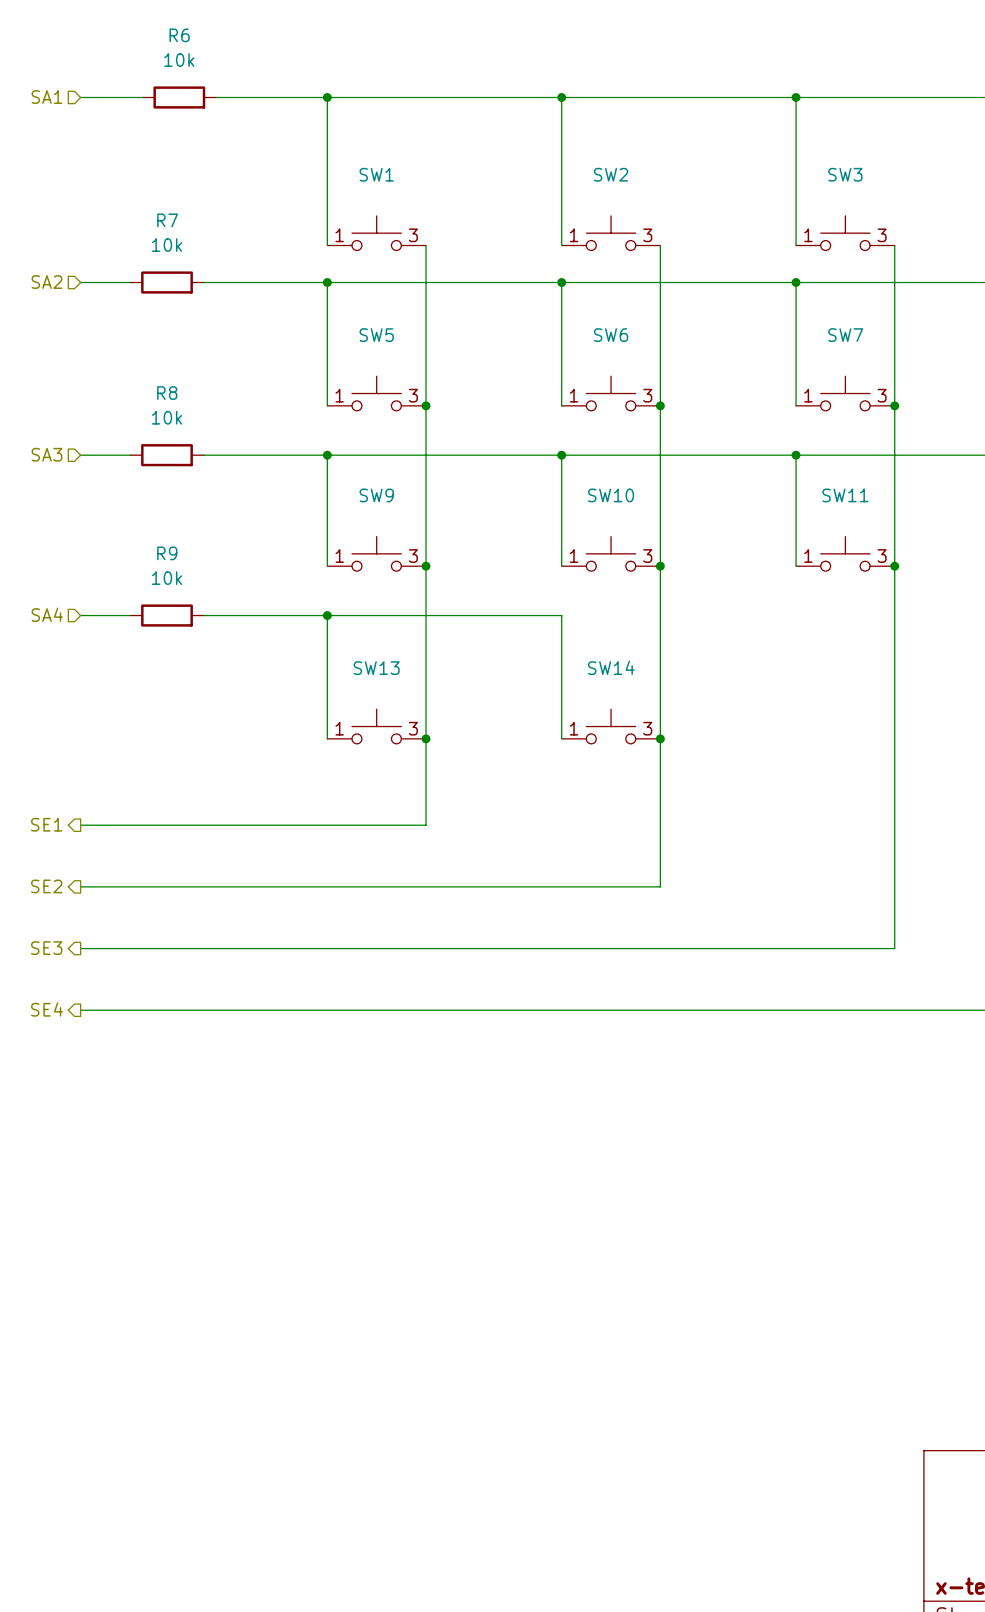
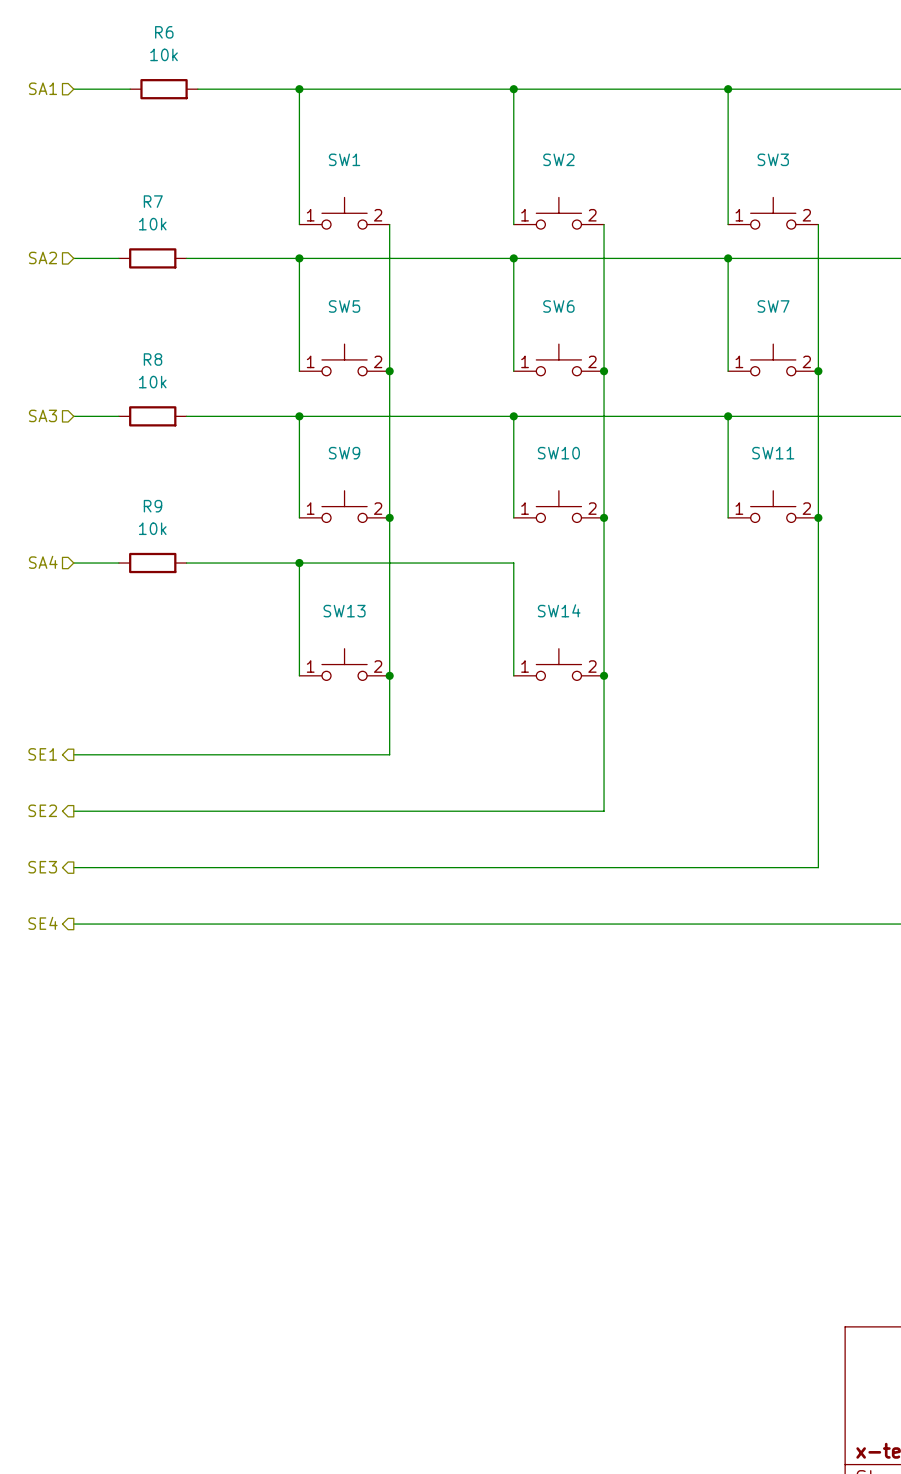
SW1 pin number: 3 (413, 235) -> 2 (378, 215)
SW2 pin number: 3 (647, 235) -> 2 (592, 215)
SW3 pin number: 3 (882, 235) -> 2 (806, 215)
SW5 pin number: 3 (413, 395) -> 2 (378, 361)
SW6 pin number: 3 (647, 395) -> 2 (592, 361)
SW7 pin number: 3 (882, 395) -> 2 (806, 361)
SW9 pin number: 3 (413, 556) -> 2 (378, 508)
SW10 pin number: 3 (647, 556) -> 2 (592, 508)
SW11 pin number: 3 (882, 556) -> 2 (806, 508)
SW13 pin number: 3 (413, 728) -> 2 (378, 666)
SW14 pin number: 3 (647, 728) -> 2 (592, 666)

